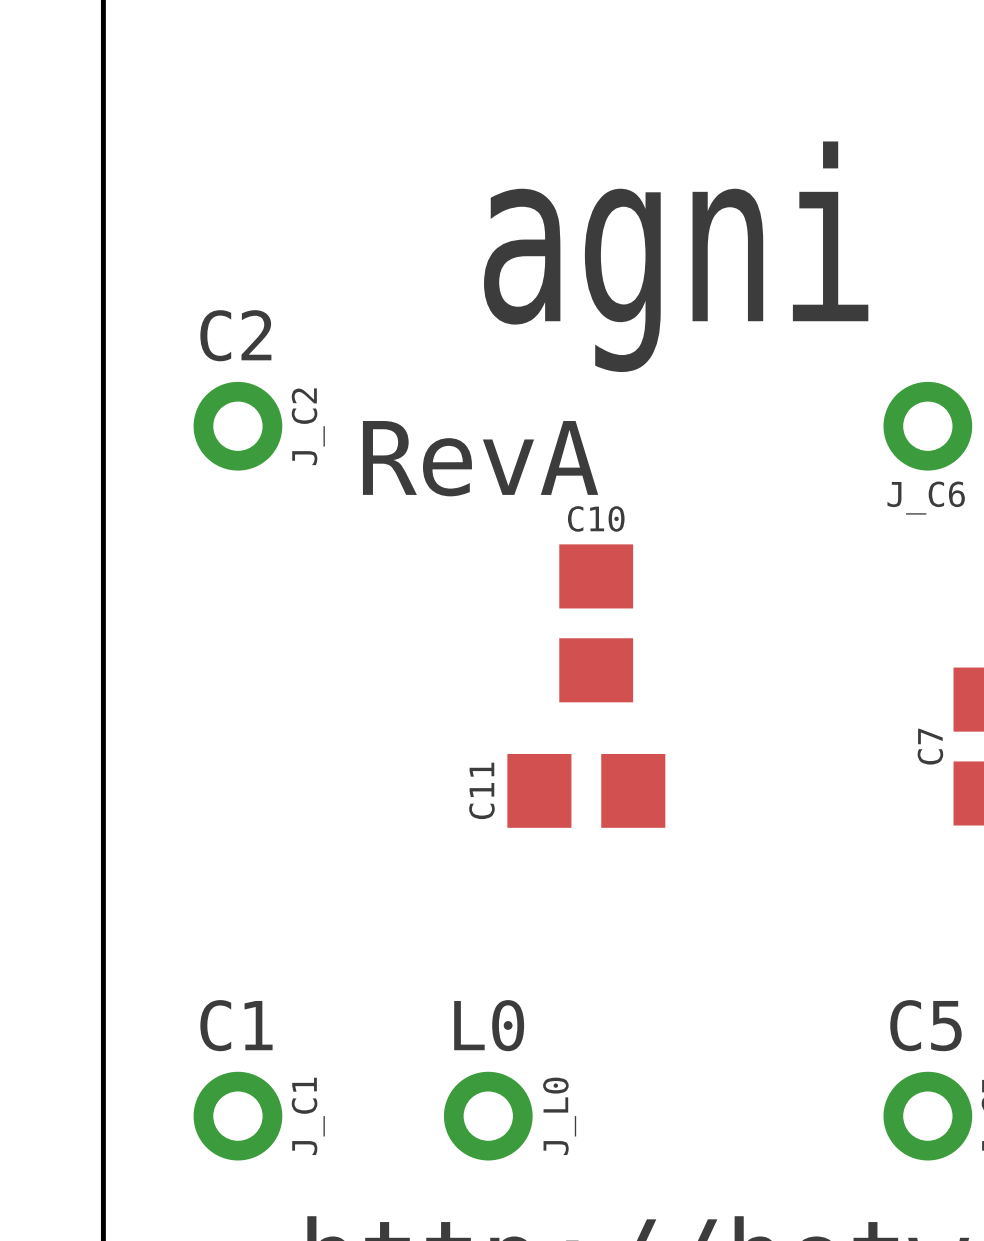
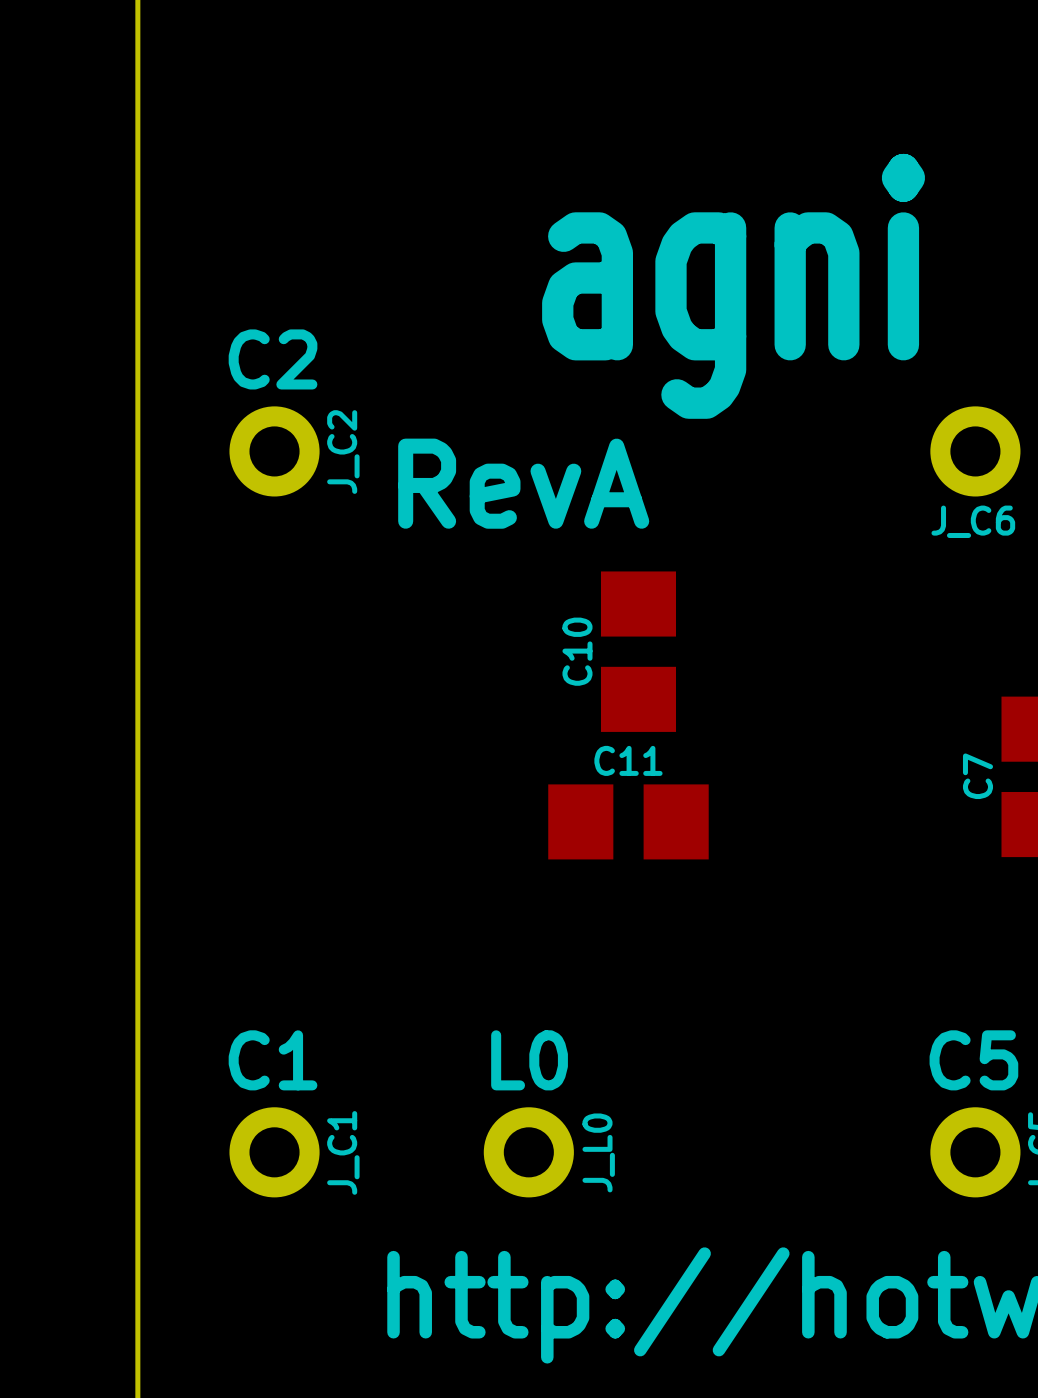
C10 name rotation: 0° (596, 518) -> 90° counterclockwise (577, 651)
C10 name position: C10 (596, 518) -> C10 (577, 651)
C11 name rotation: 0° (481, 790) -> 90° clockwise (628, 760)
C11 name position: C11 (481, 790) -> C11 (628, 760)

